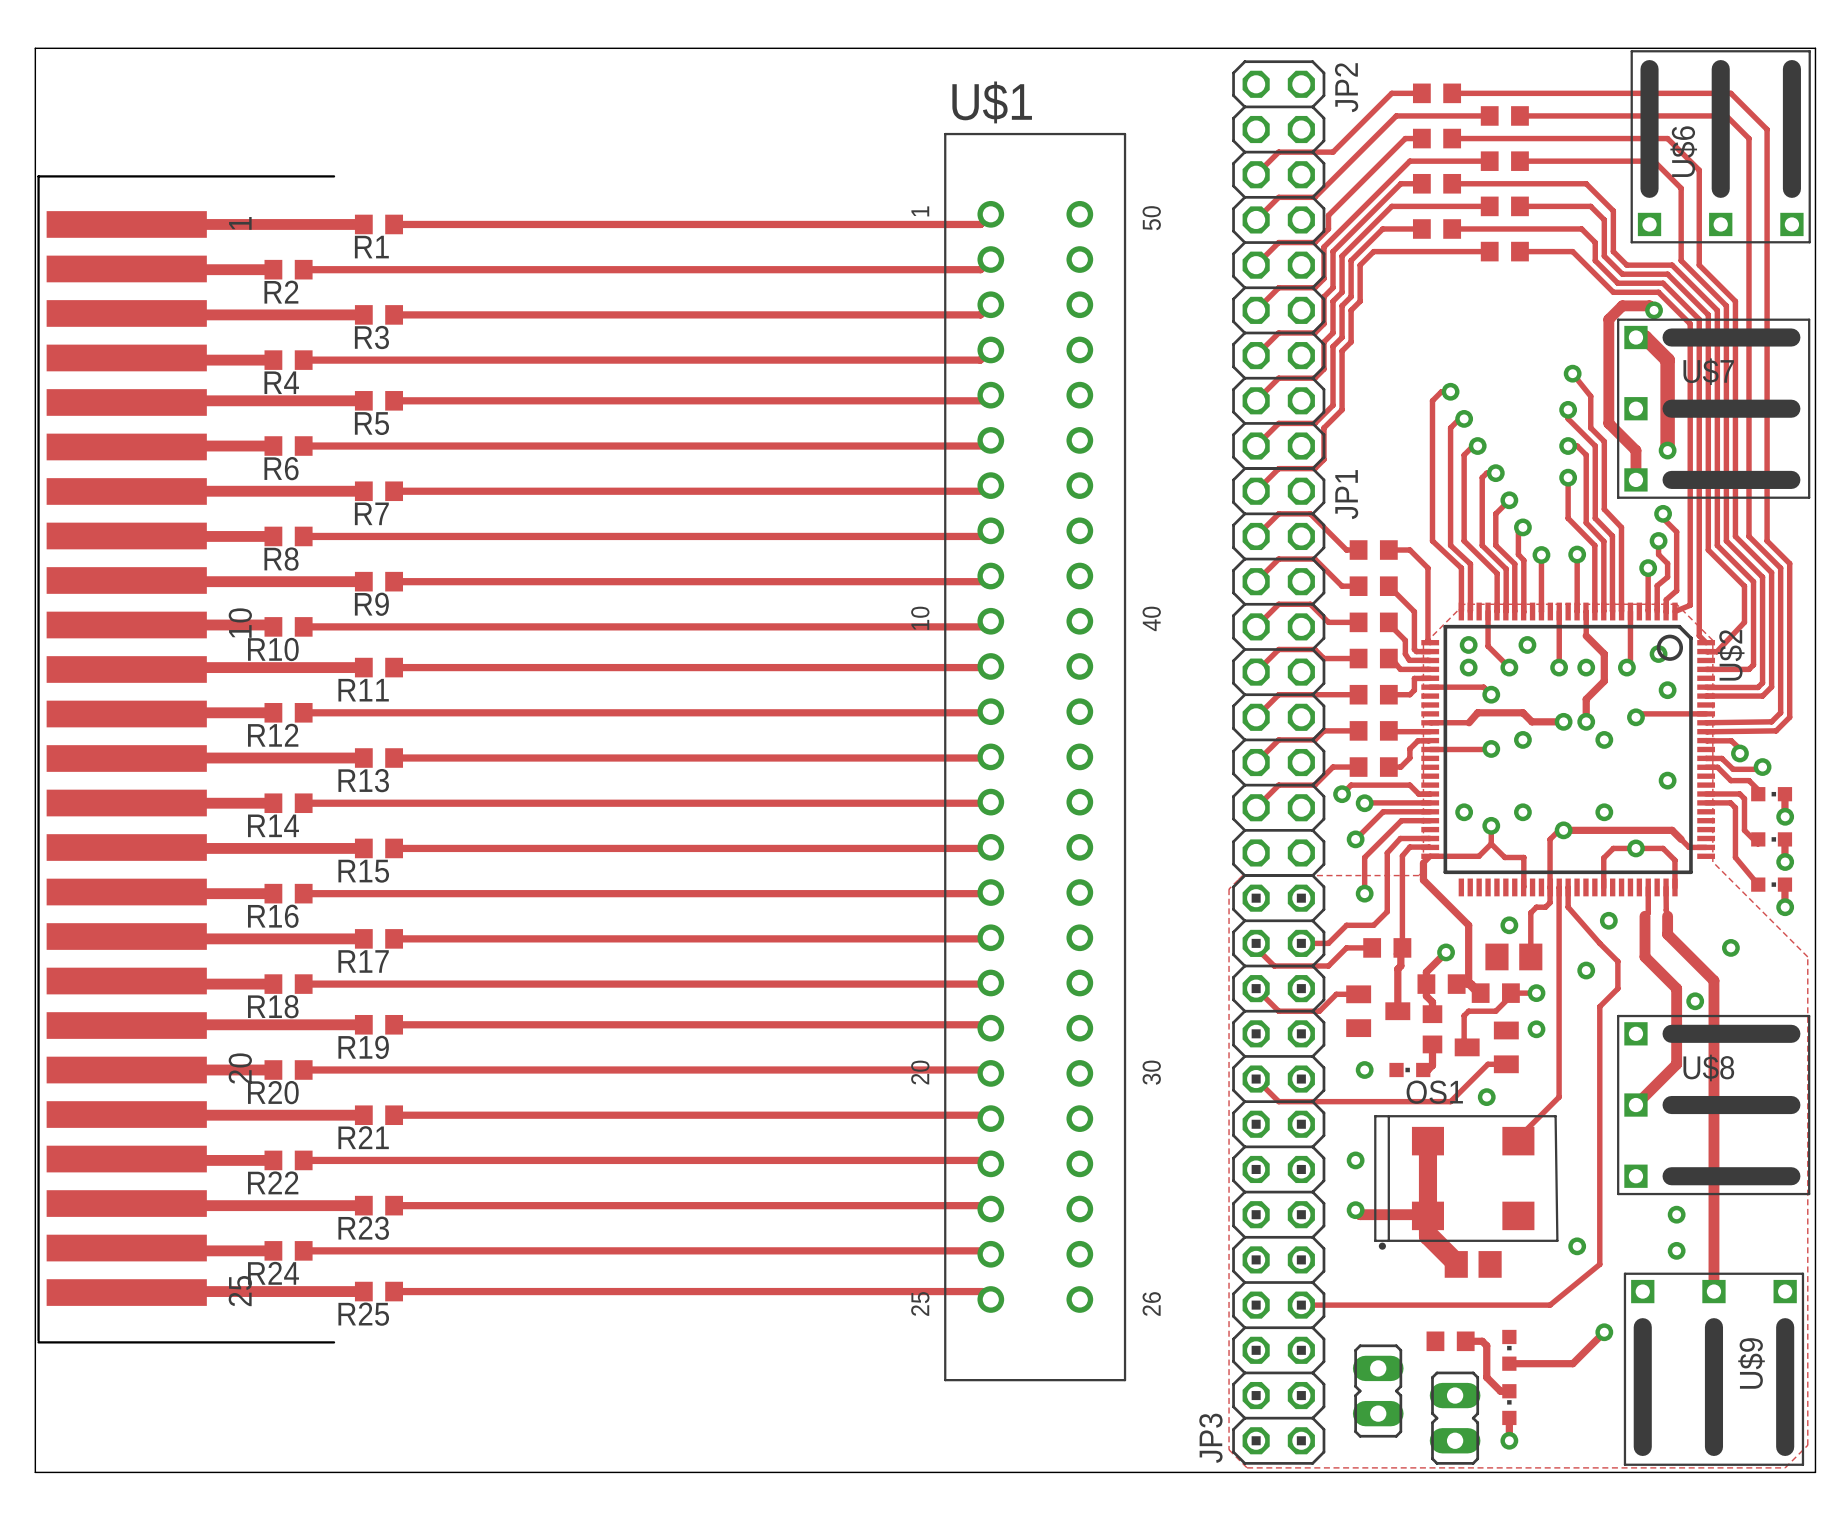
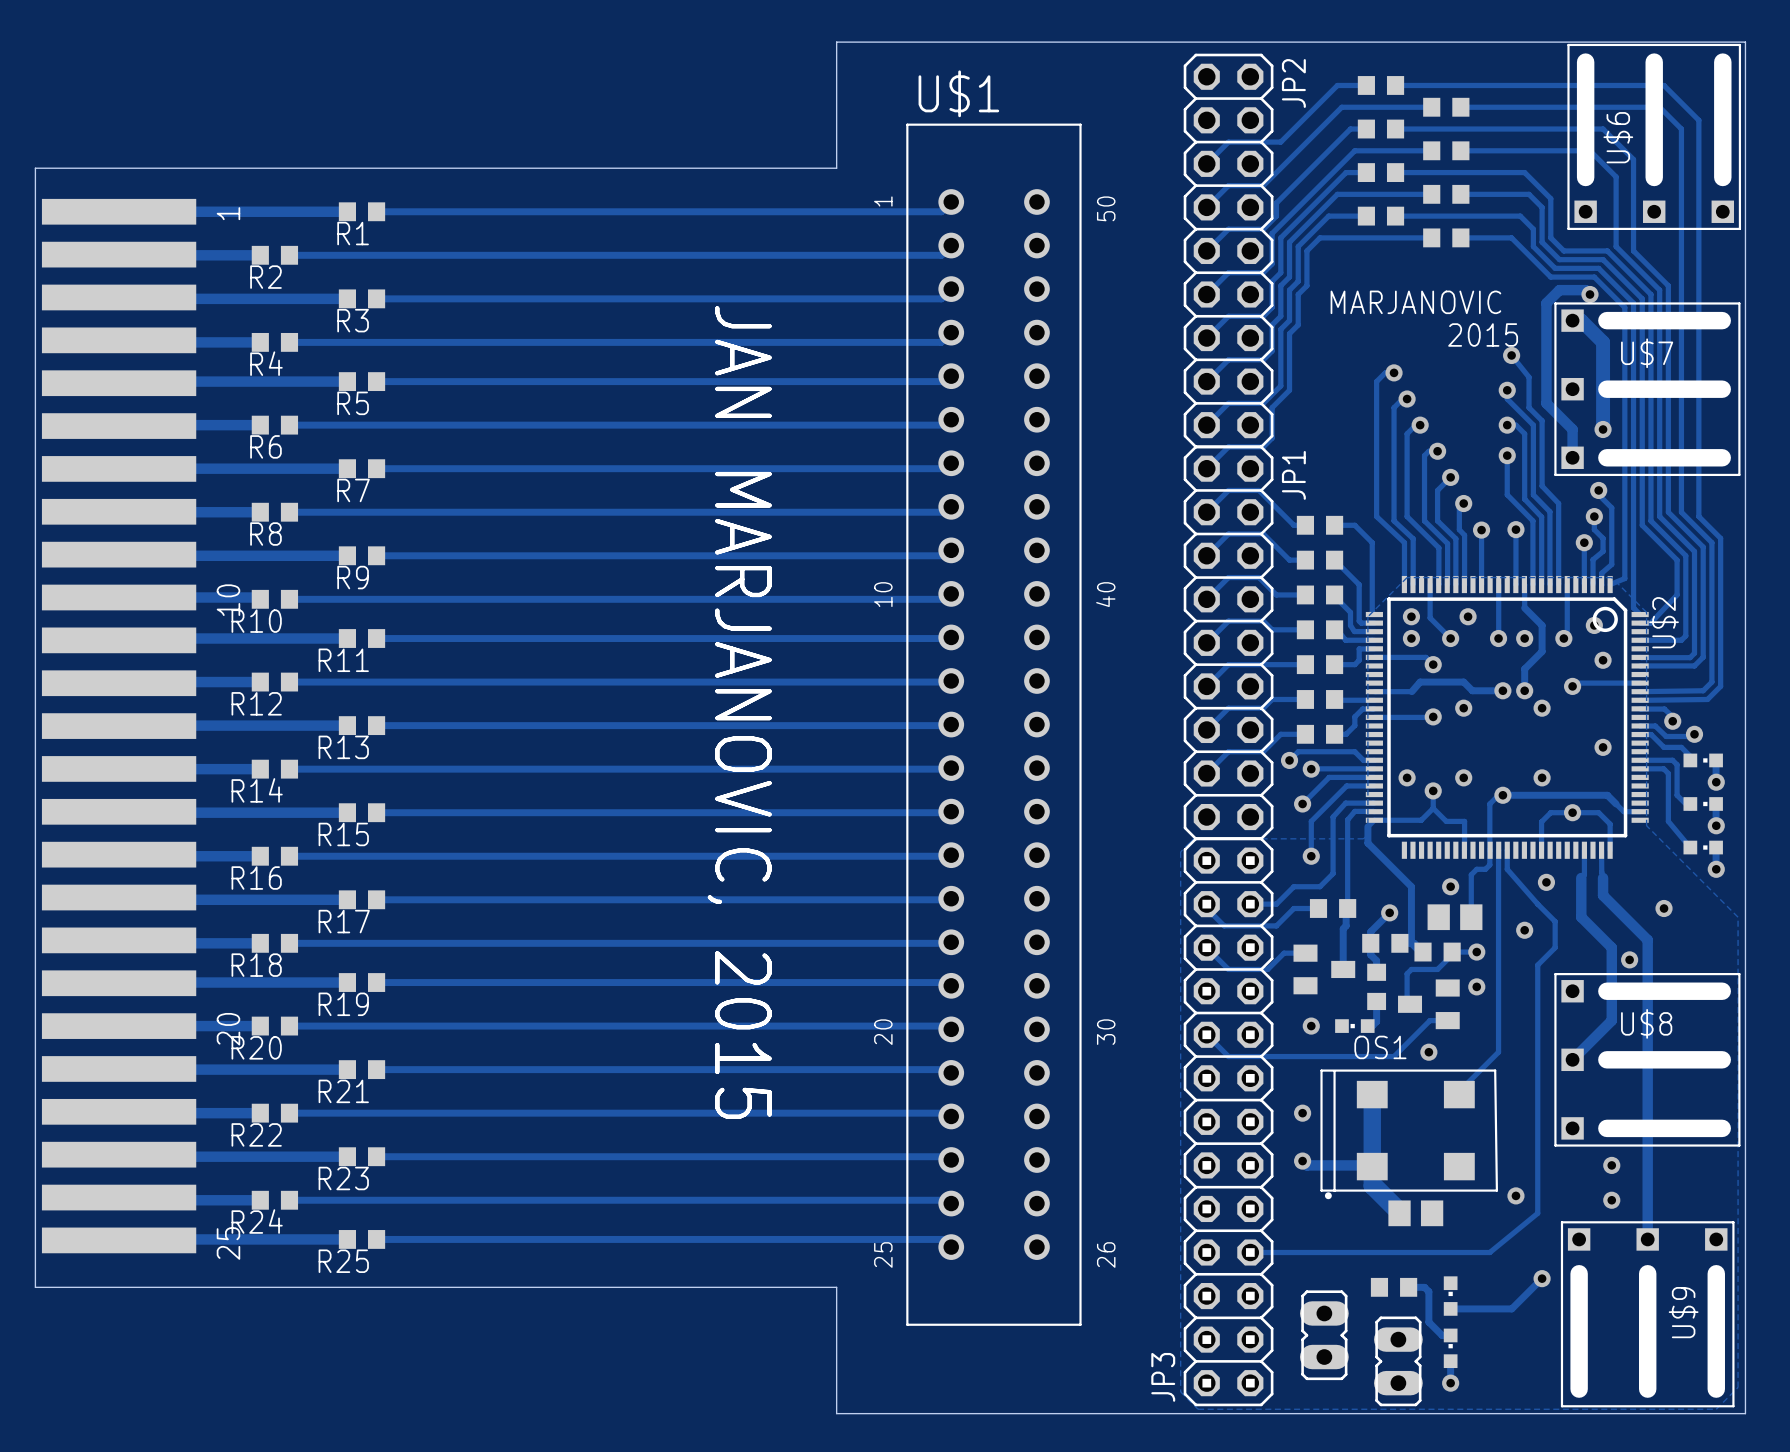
board edge: (871, 48) (35, 48) (35, 1472) (871, 1472) -> (836, 42) (836, 168) (35, 168) (35, 1287) (836, 1287) (836, 1413)
text: none -> MARJANOVIC (1415, 302)
text: none -> 2015 (1483, 335)
text: none -> JAN MARJANOVIC, 2015 (739, 712)
part: (186, 759) -> none

